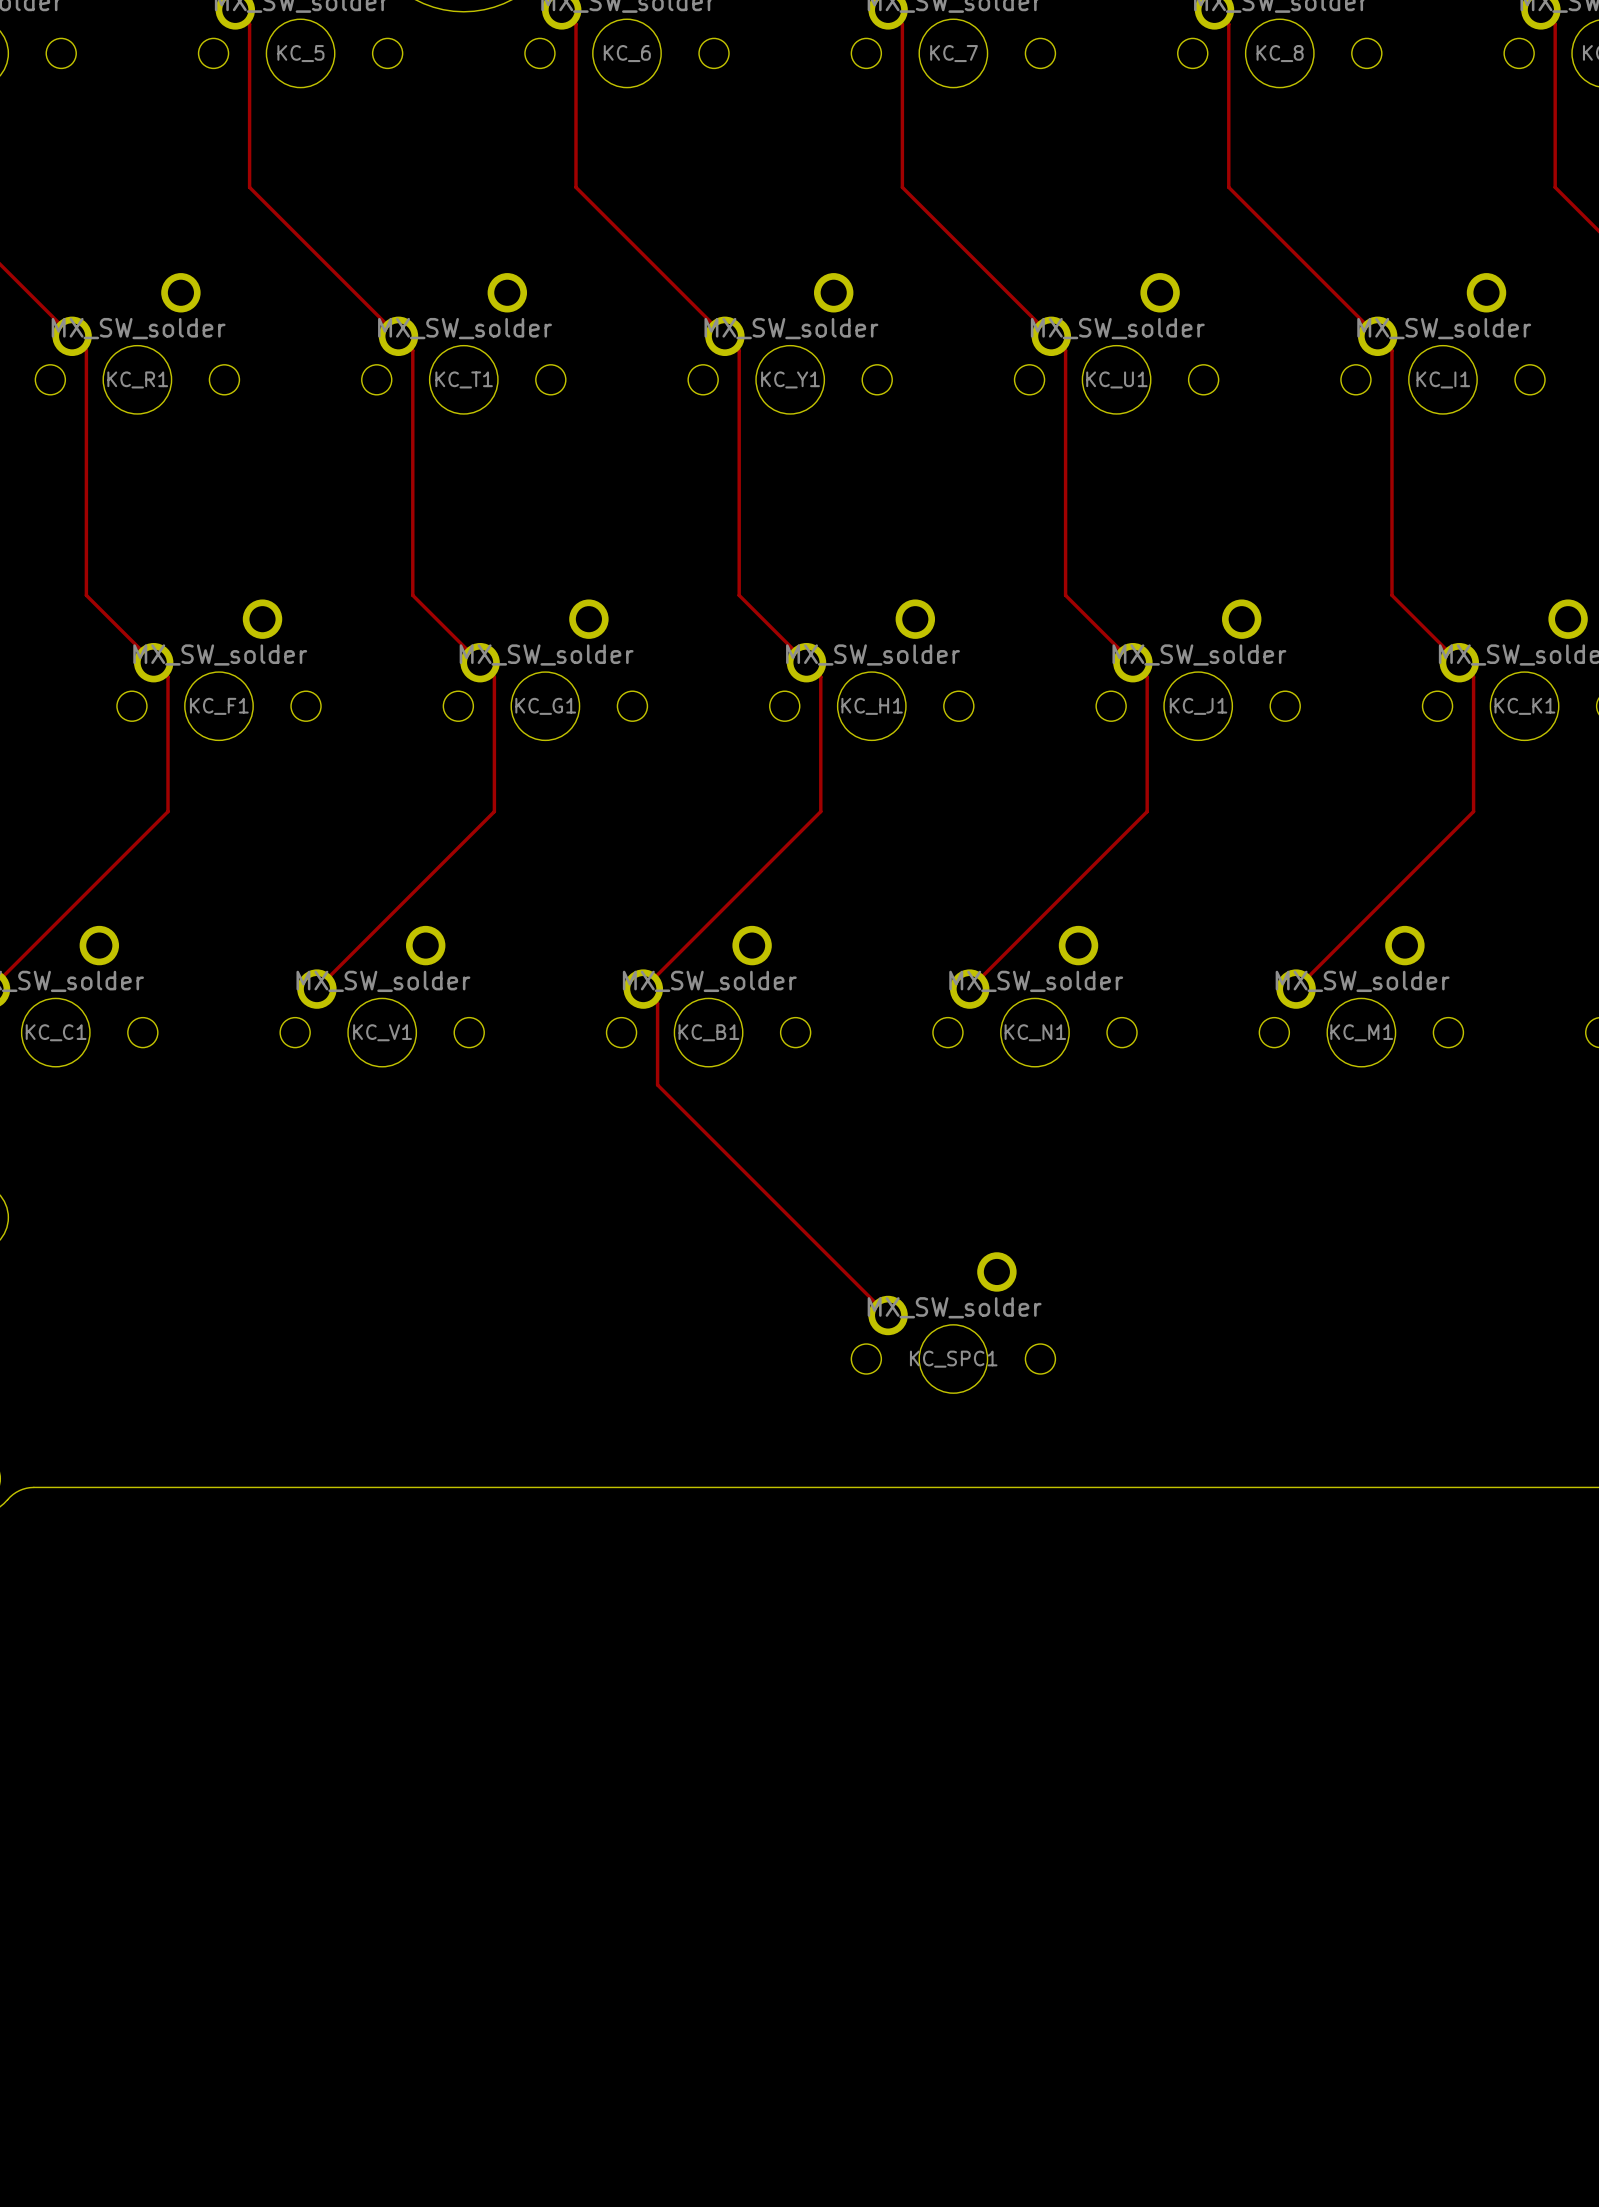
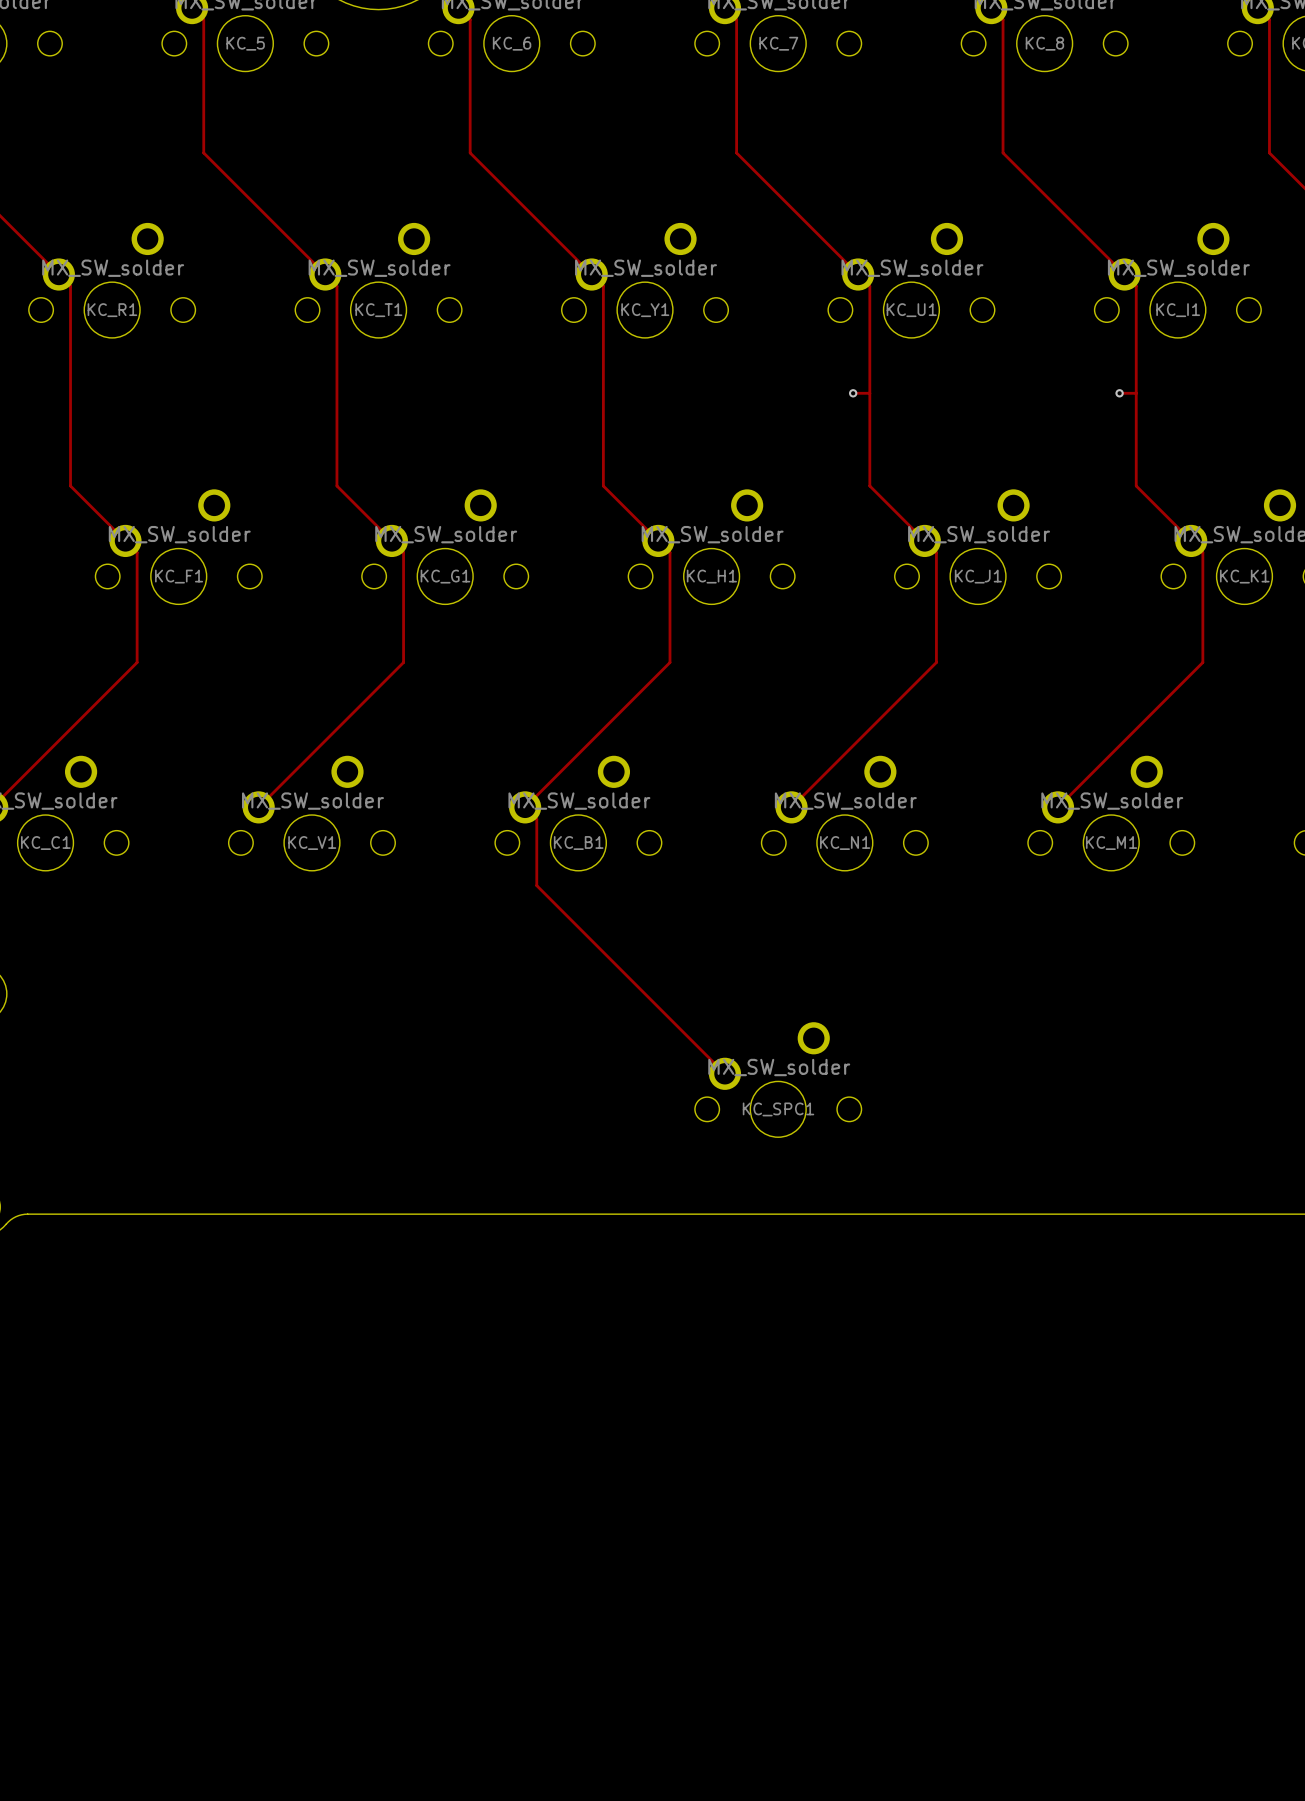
track: none -> (853, 393) (869, 393)
via: none -> (853, 393)
track: none -> (1119, 393) (1136, 393)
via: none -> (1119, 393)

